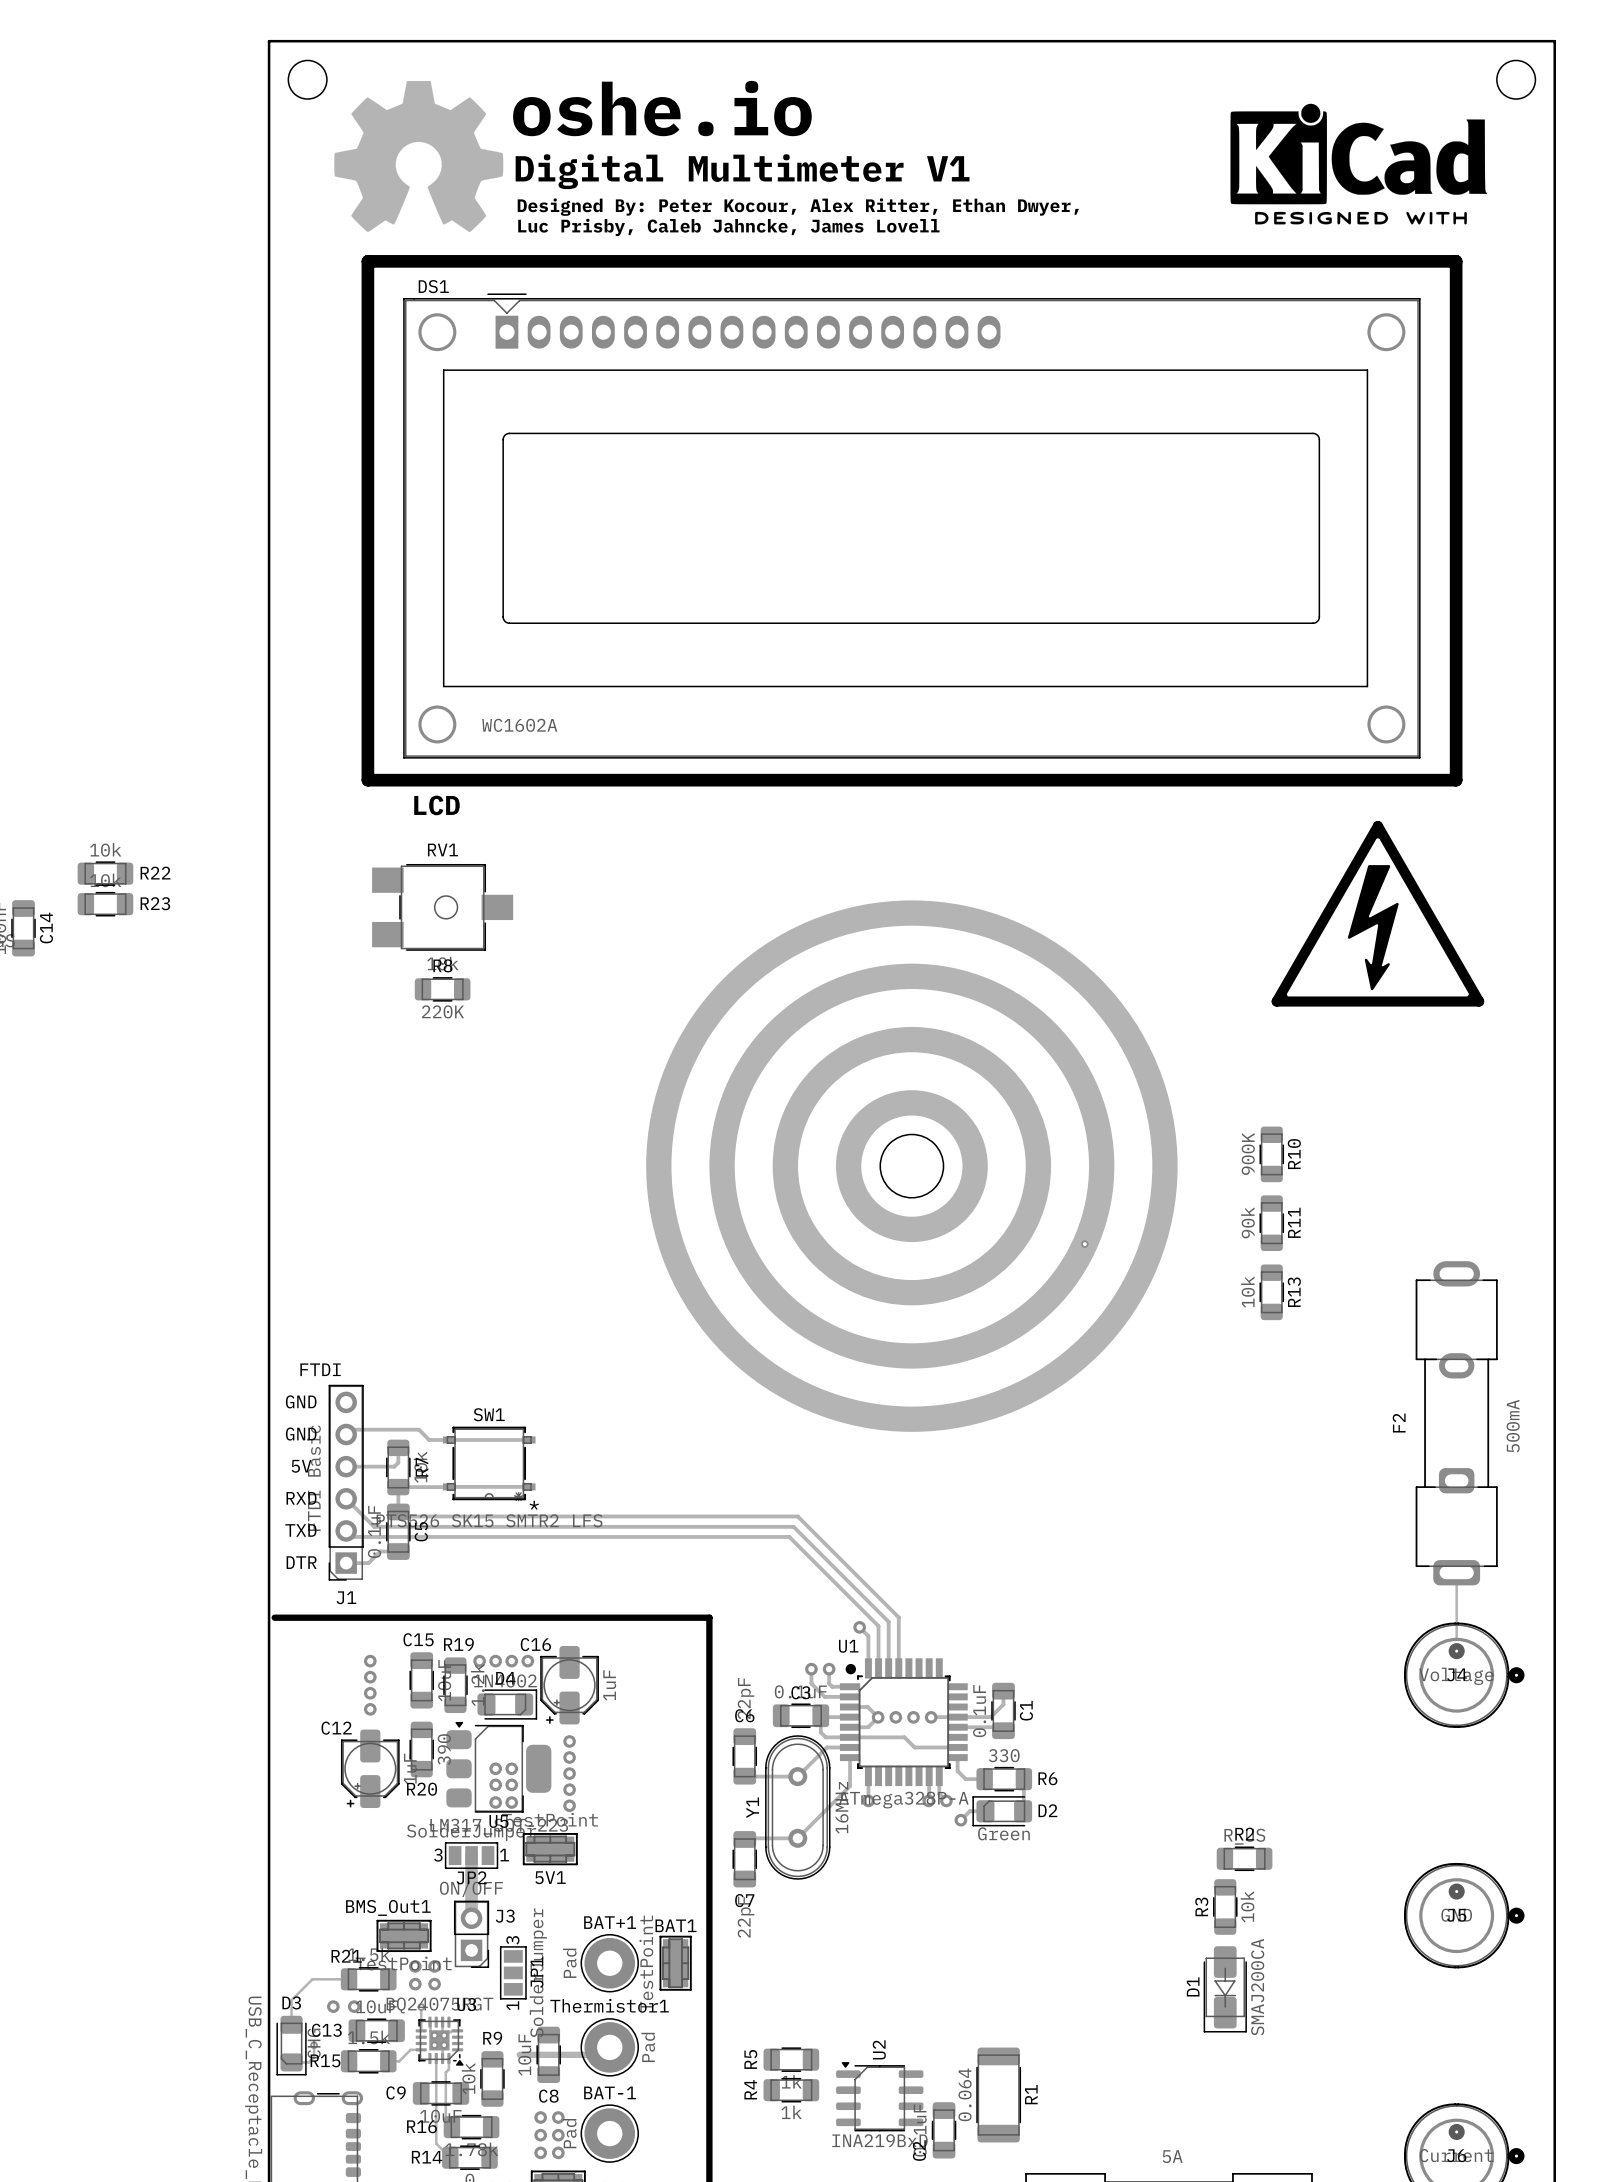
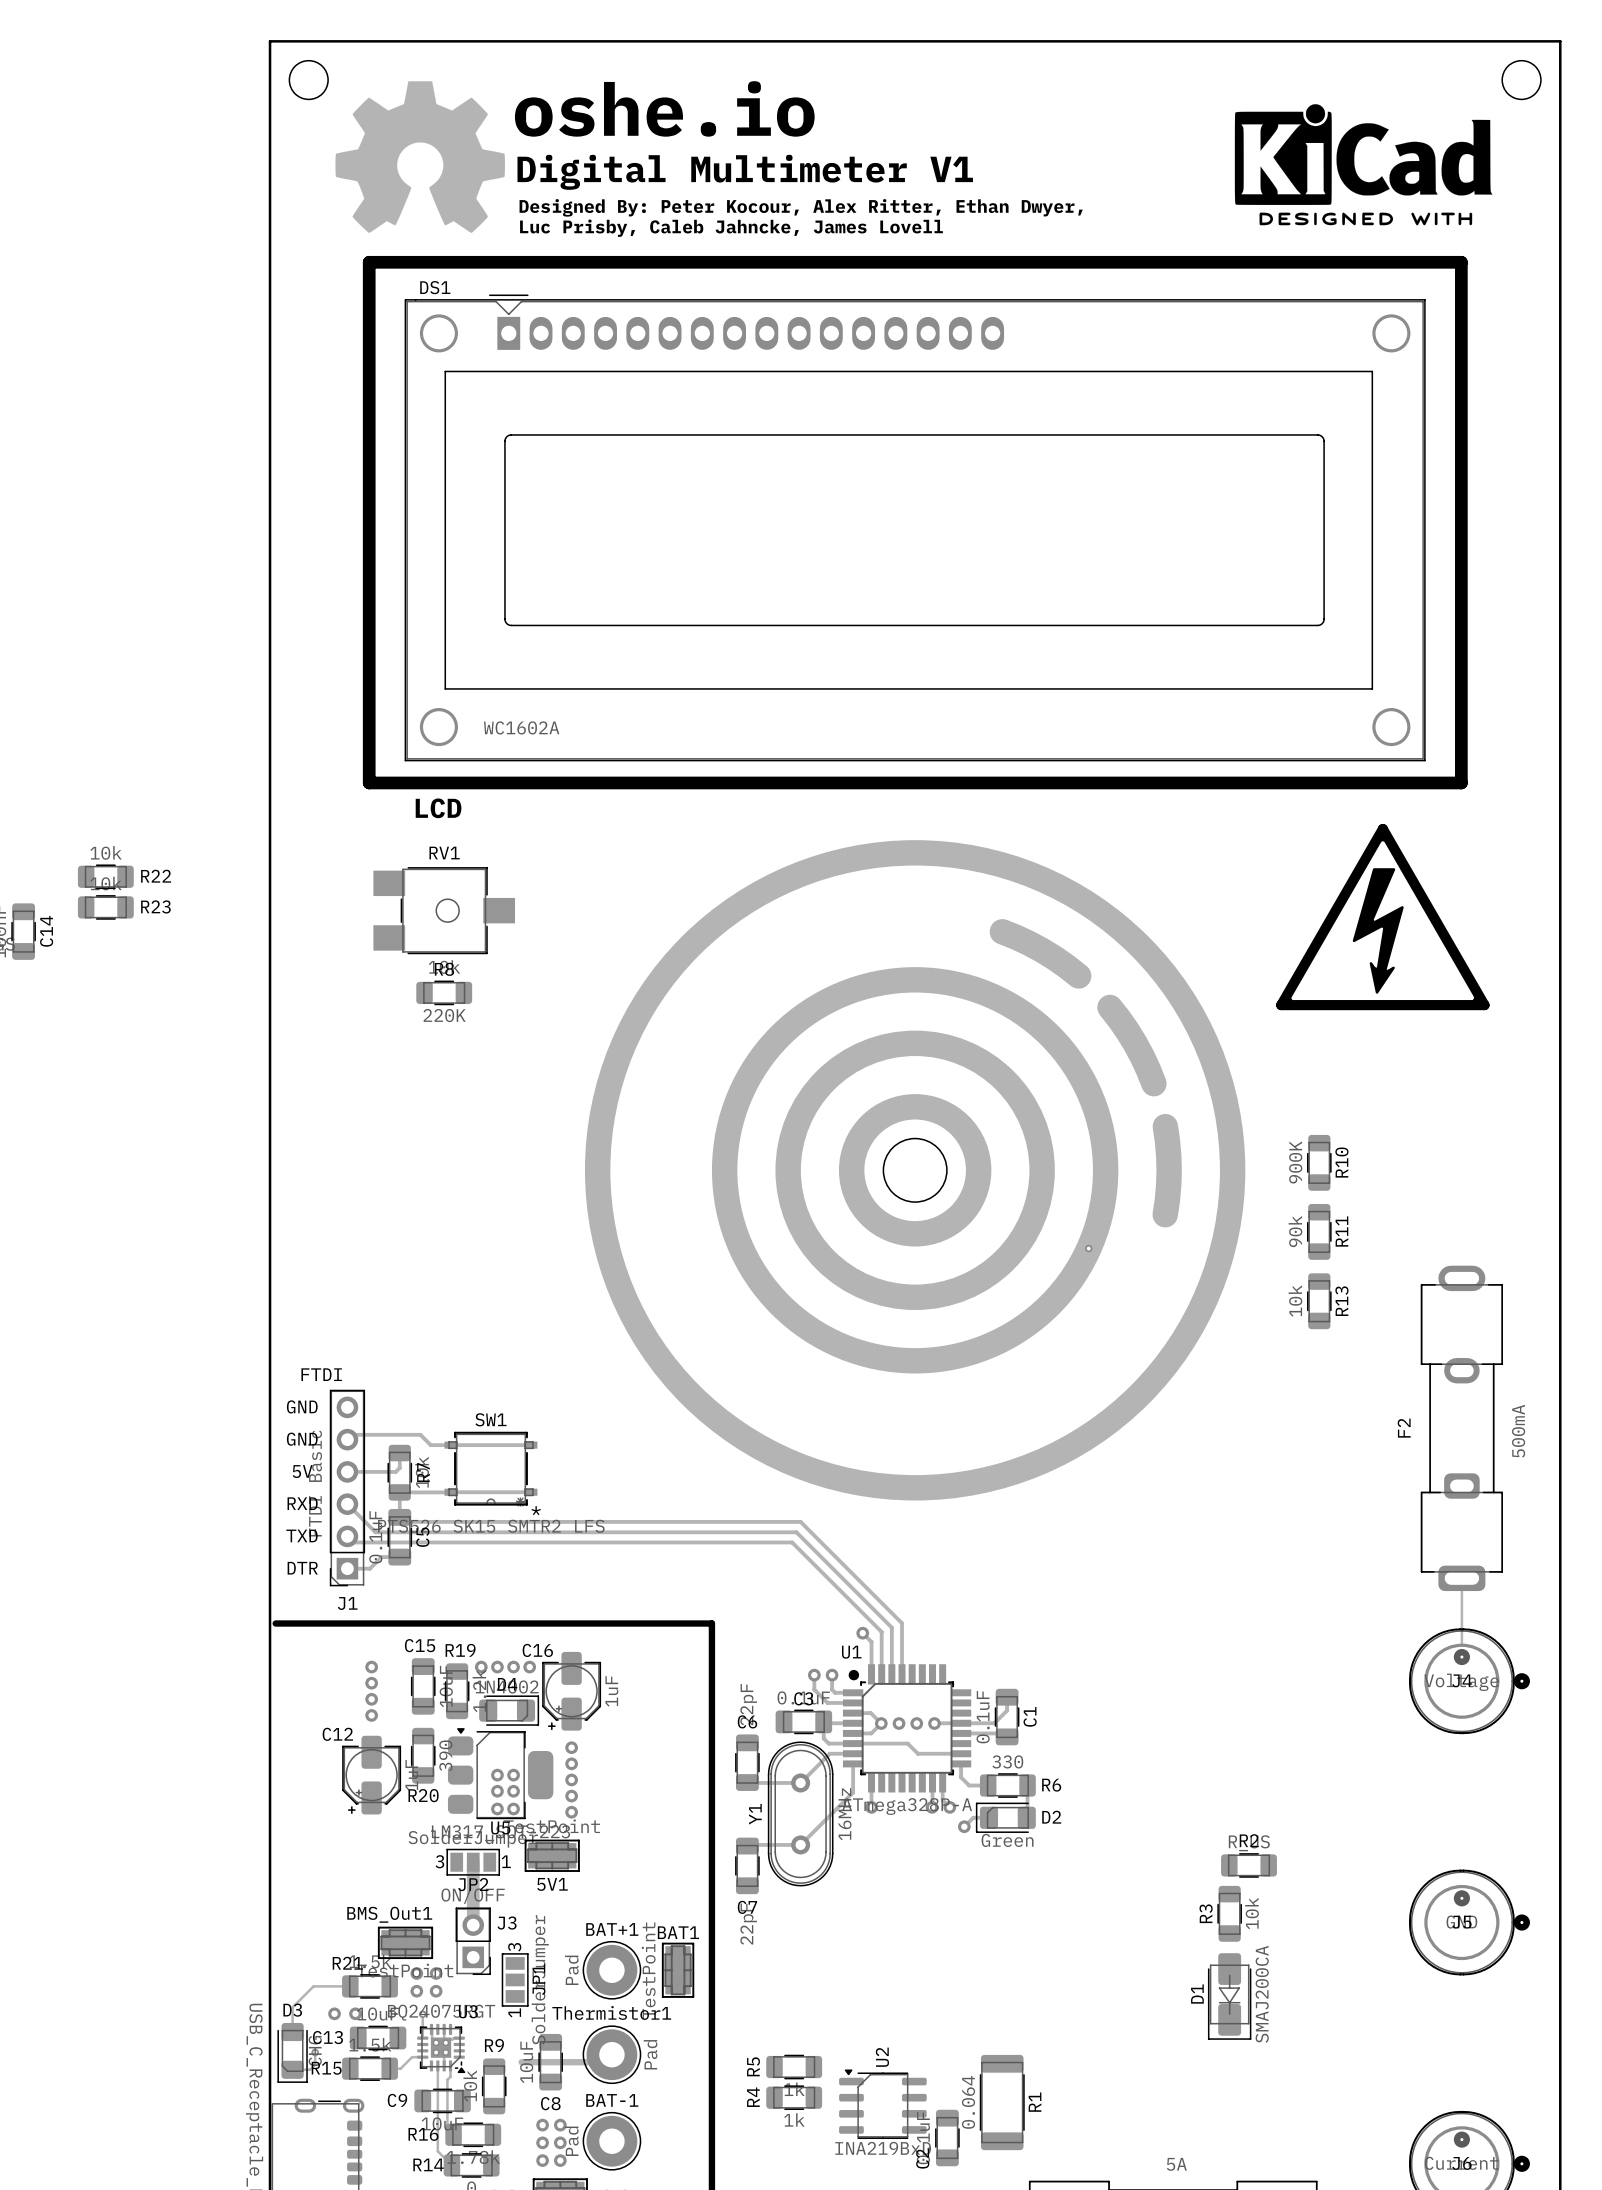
drawing shape: [646, 900, 1178, 1432] -> [584, 840, 1246, 1501]
track: none -> (1002, 931) (1042, 950) (1078, 976)
track: none -> (1110, 1007) (1135, 1043) (1153, 1083)
track: none -> (1165, 1126) (1169, 1170) (1165, 1214)
R10 position: (1271, 1154) -> (1319, 1162)
R11 position: (1271, 1223) -> (1319, 1231)
R13 position: (1271, 1292) -> (1319, 1301)

